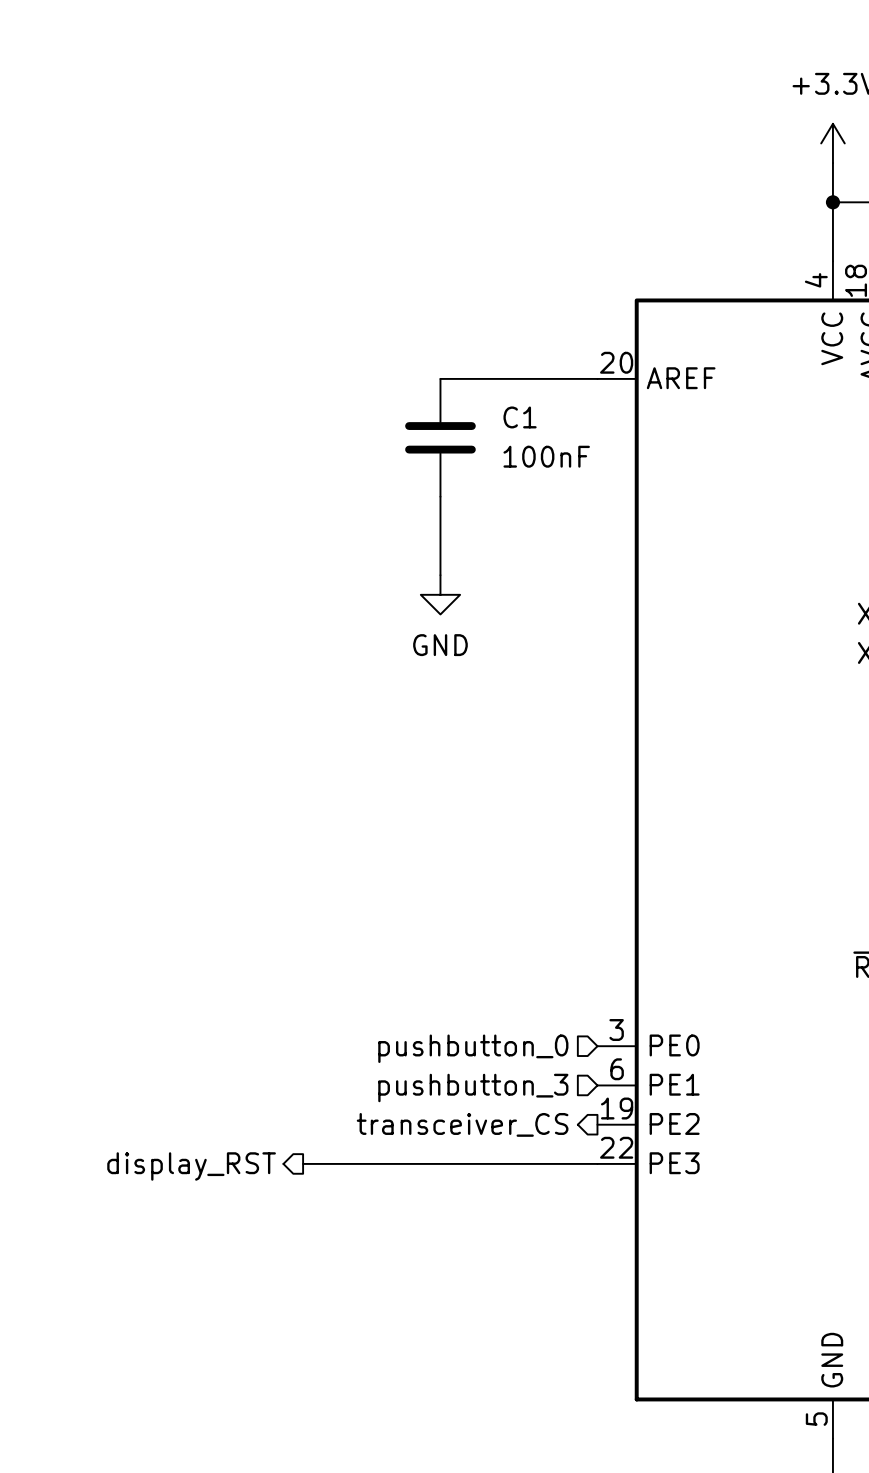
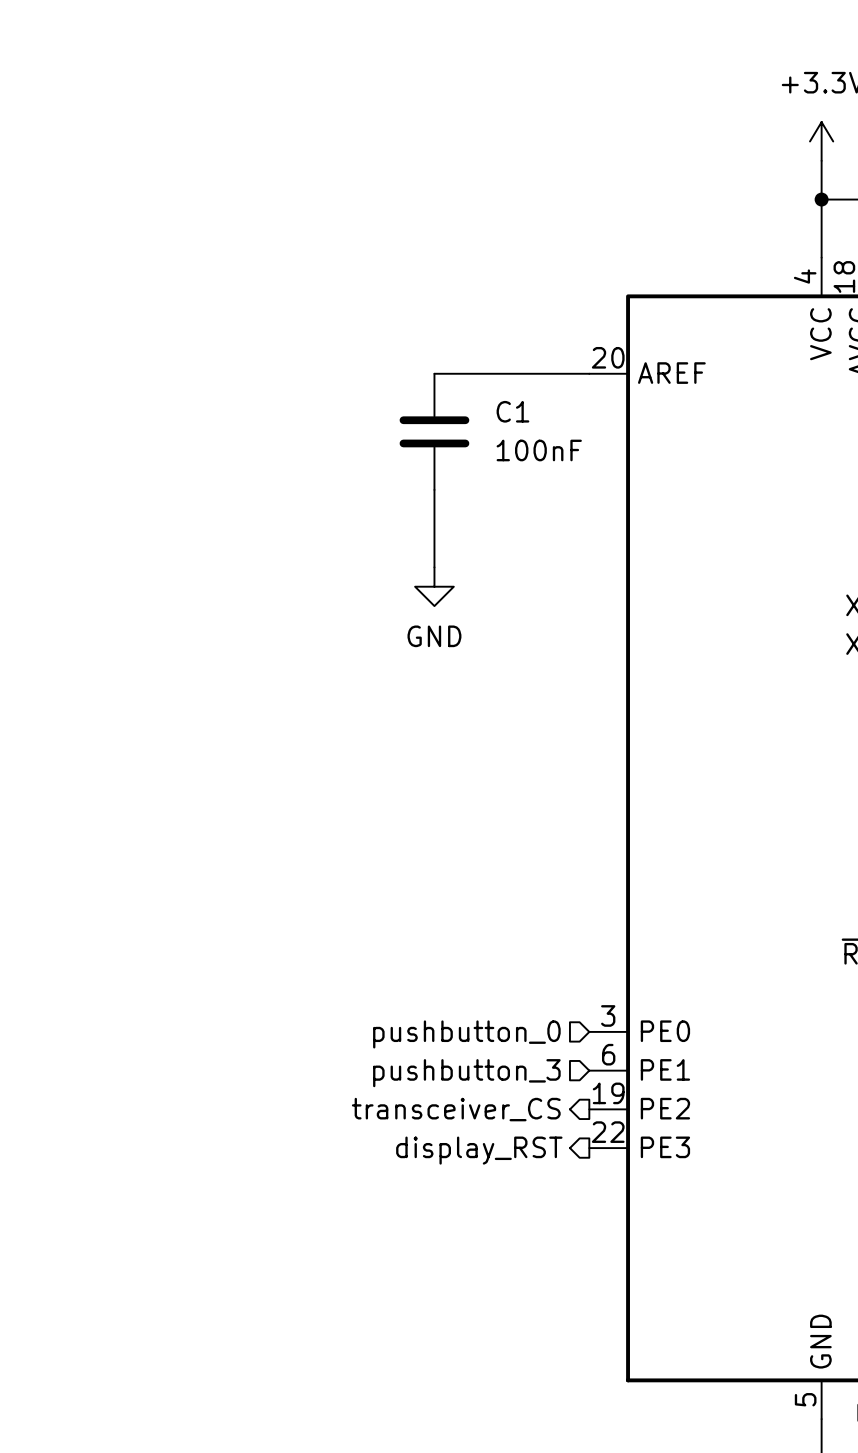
wire: (303, 1163) (597, 1163) -> none
hierarchical label position: display_RST (191, 1166) -> display_RST (479, 1150)

